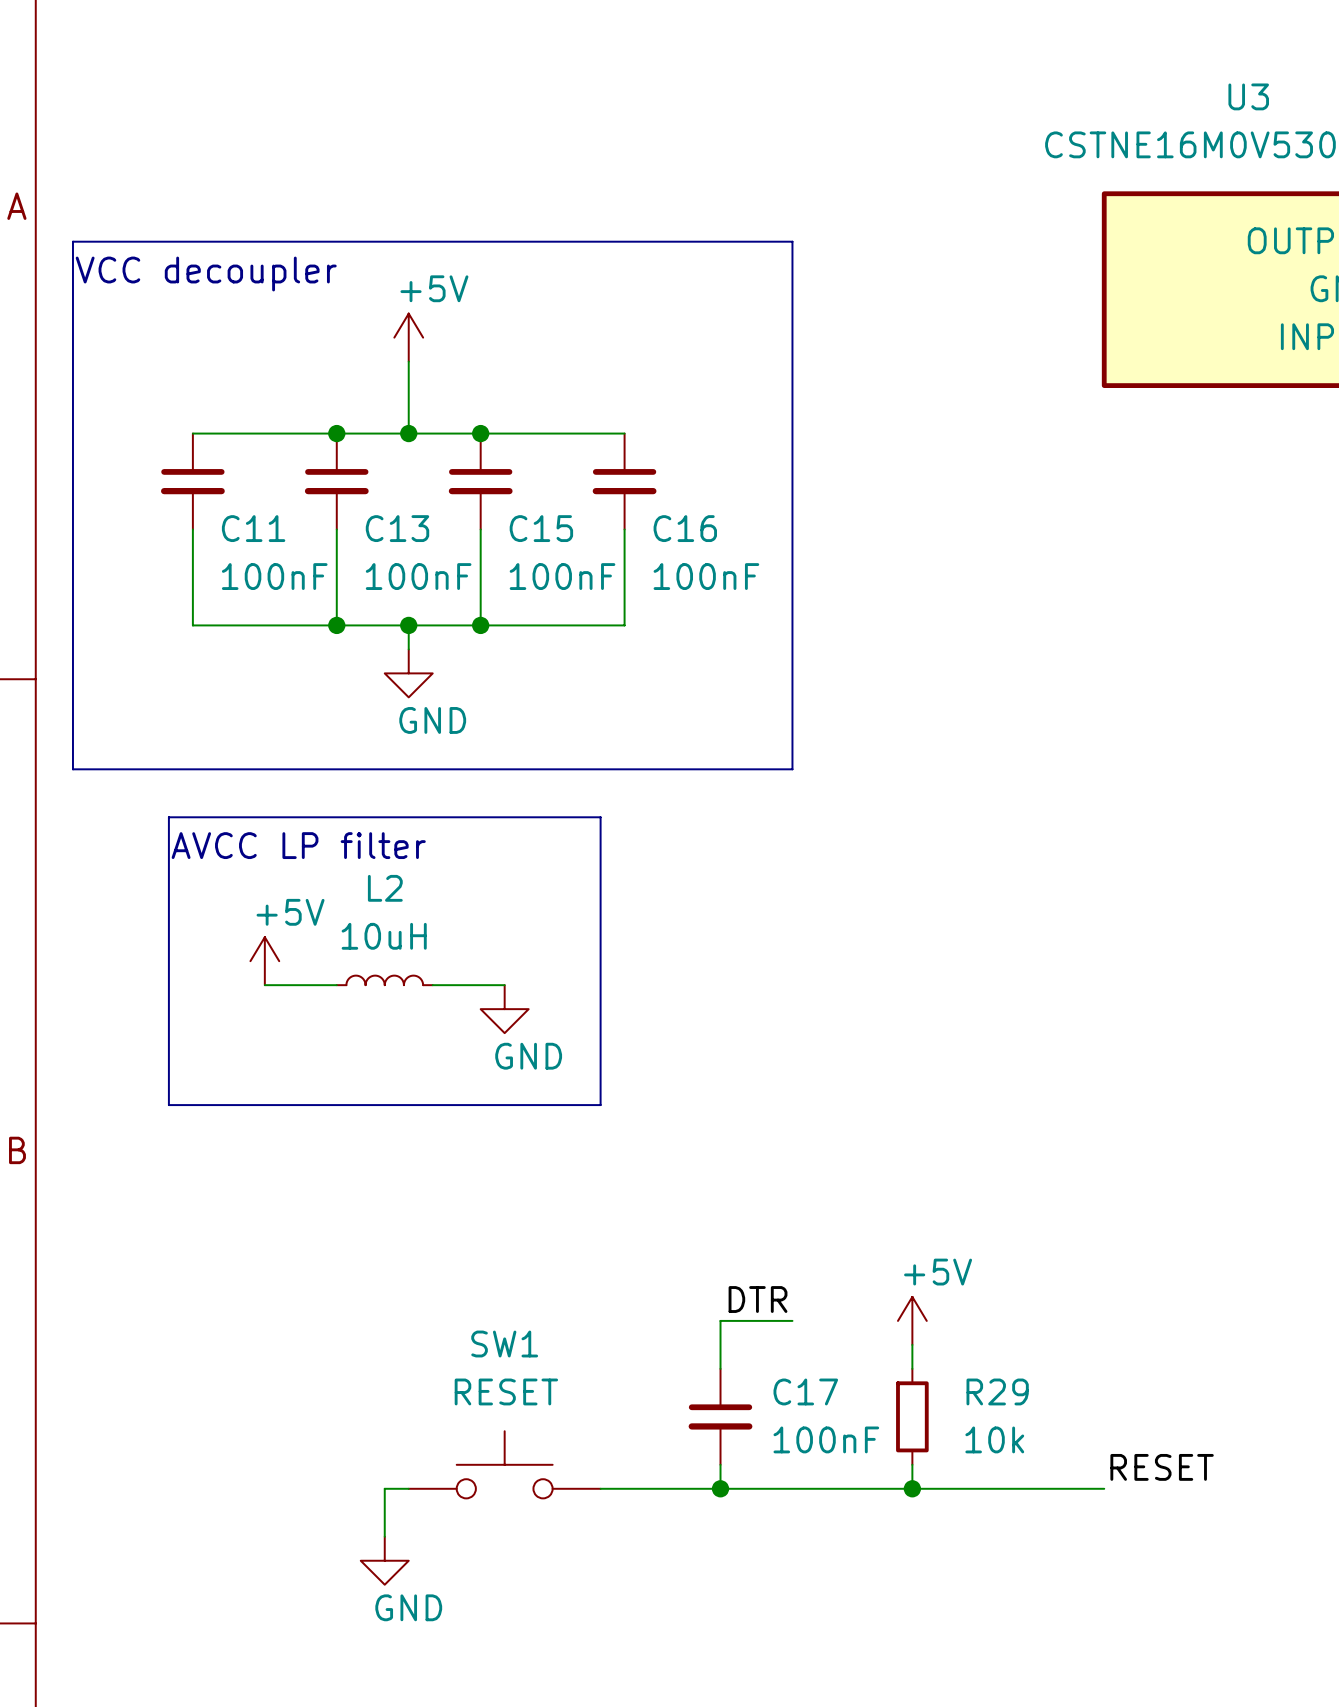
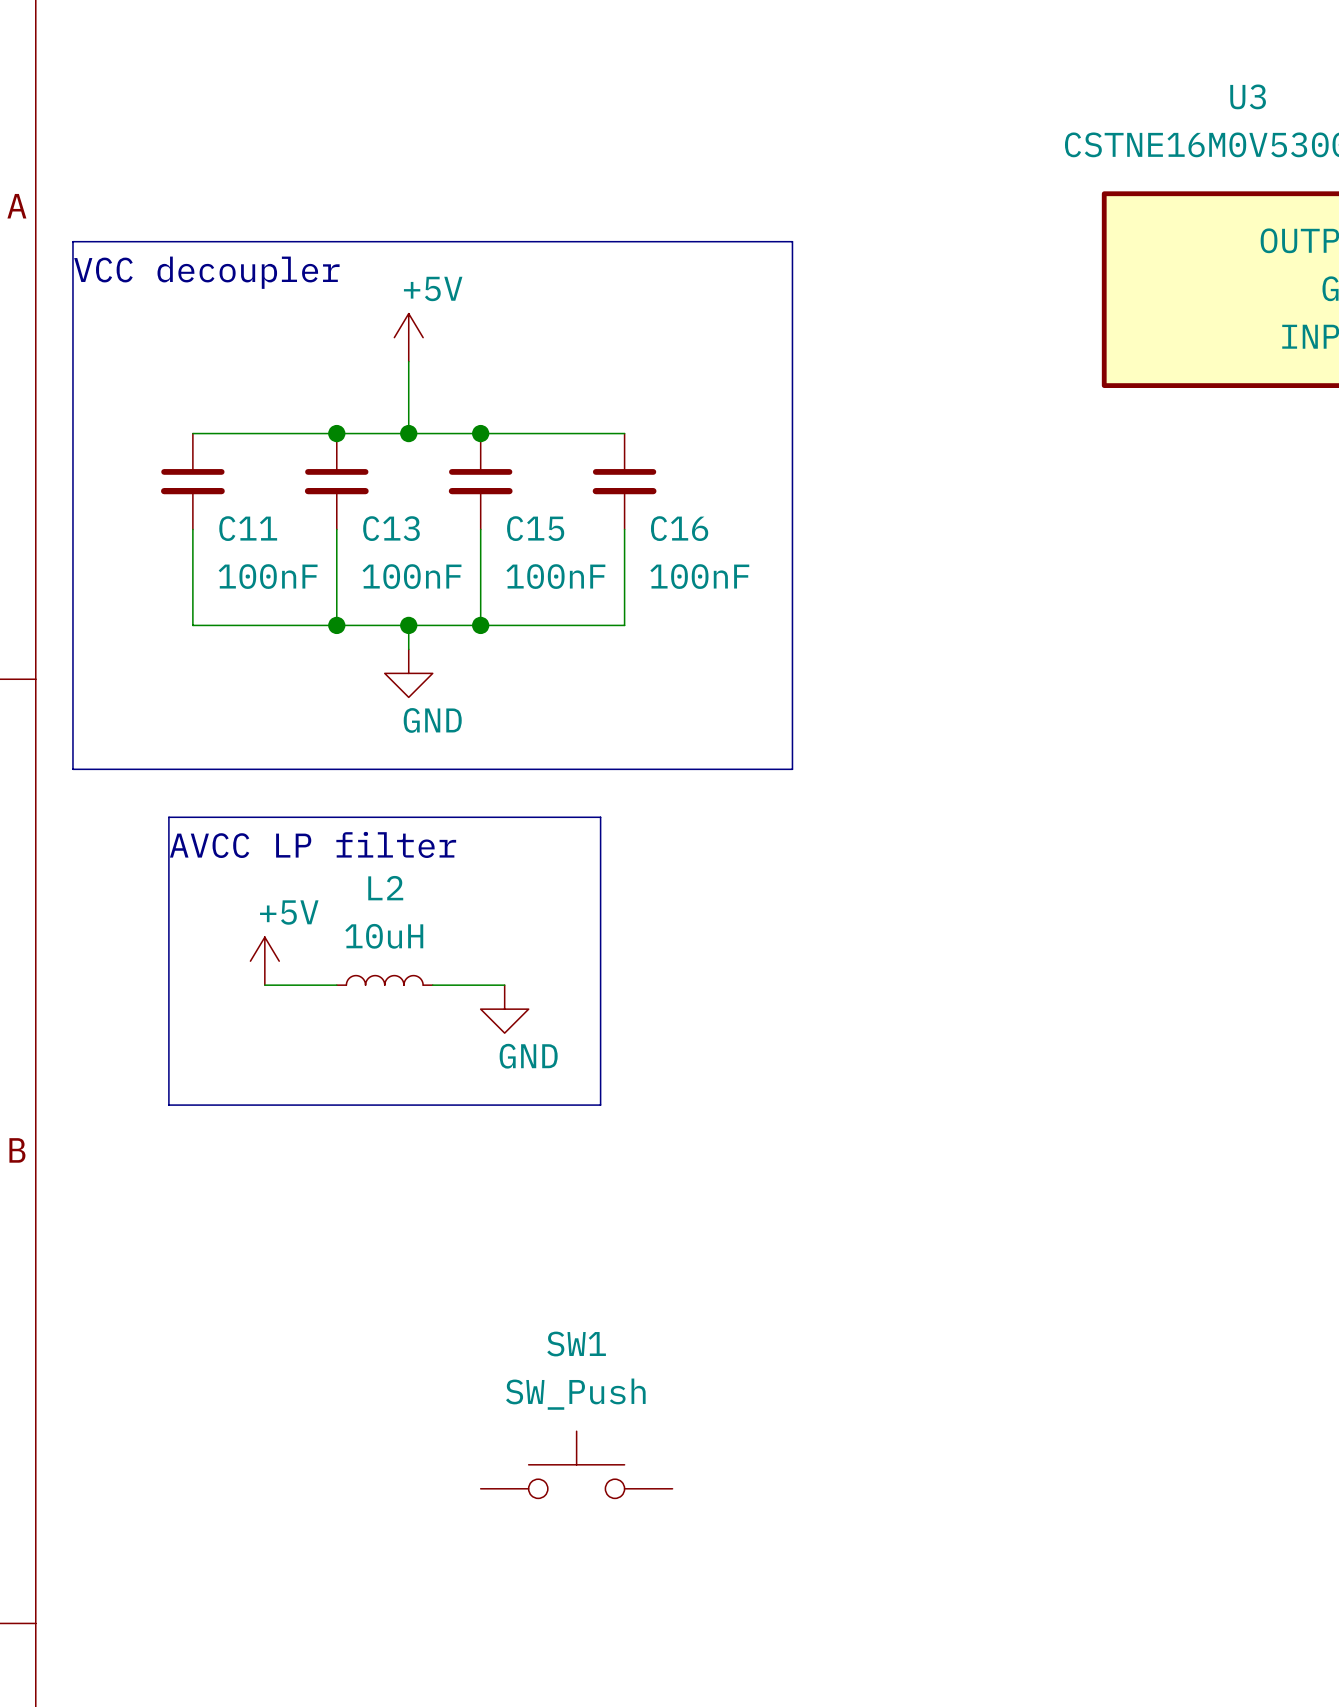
label: DTR (758, 1299) -> none
wire: (792, 1320) (720, 1320) (720, 1368) -> none
power symbol: +5V (912, 1320) -> none
wire: (912, 1344) (912, 1368) -> none
SW1 value: RESET (506, 1391) -> SW_Push (575, 1394)
C17: 100nF (720, 1416) -> none
R29: 10k (912, 1416) -> none
SW1 position: (504, 1464) -> (576, 1464)
wire: (720, 1464) (720, 1488) -> none
wire: (912, 1464) (912, 1488) -> none
label: RESET (1162, 1467) -> none
wire: (408, 1488) (384, 1488) (384, 1536) -> none
wire: (600, 1488) (1104, 1488) -> none
junction: (720, 1488) -> none
junction: (912, 1488) -> none
power symbol: GND (384, 1560) -> none

